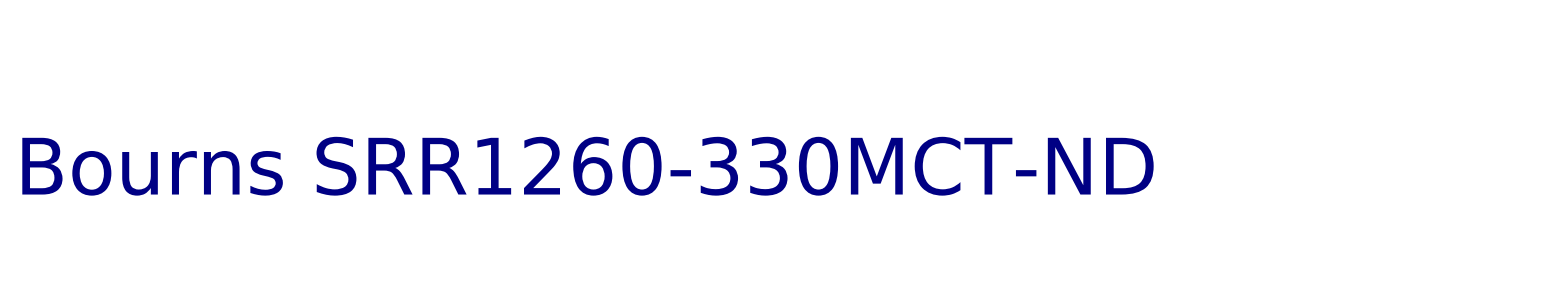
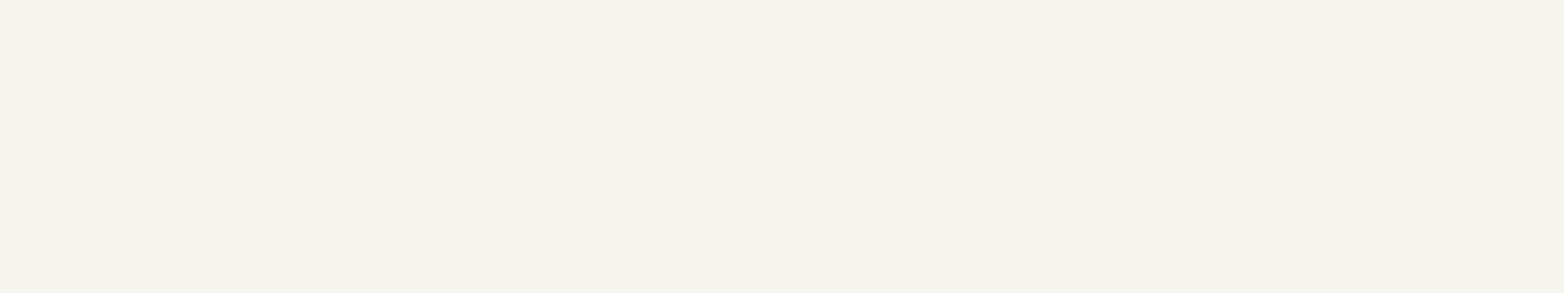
text: Bourns SRR1260-330MCT-ND (587, 166) -> none

